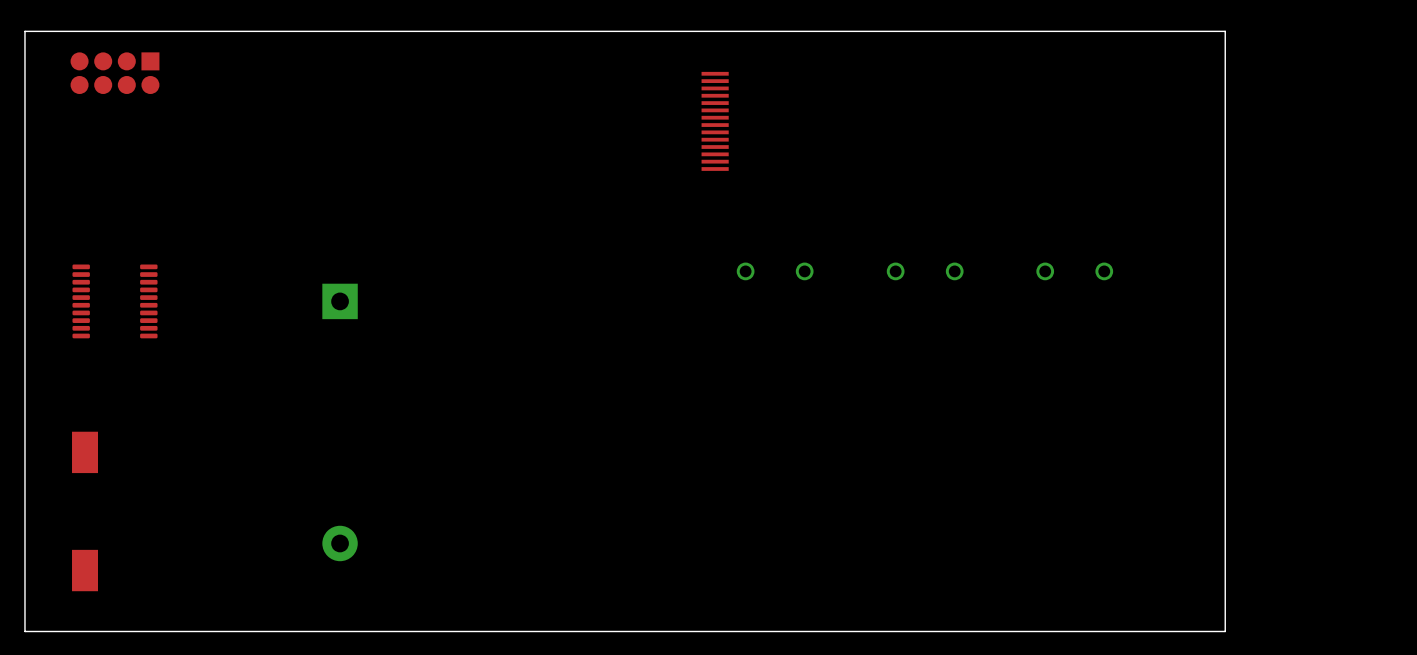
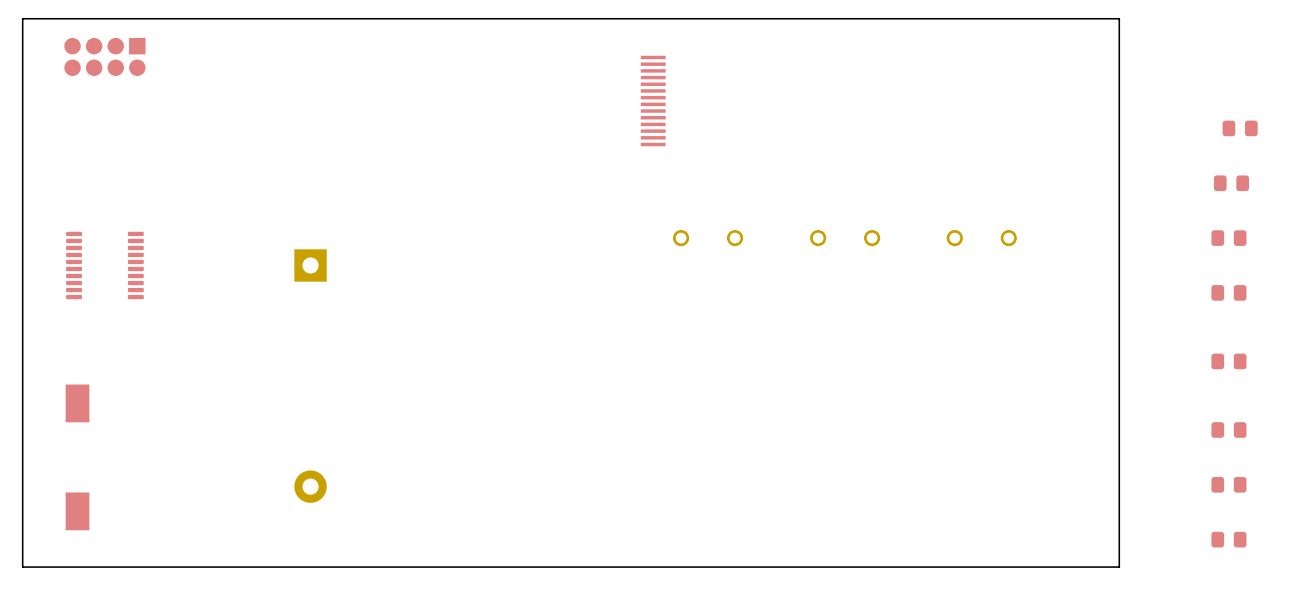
part: none -> (1240, 128)
part: none -> (1231, 183)
part: none -> (1228, 238)
part: none -> (1228, 292)
part: none -> (1228, 361)
part: none -> (1228, 429)
part: none -> (1228, 484)
part: none -> (1228, 539)

